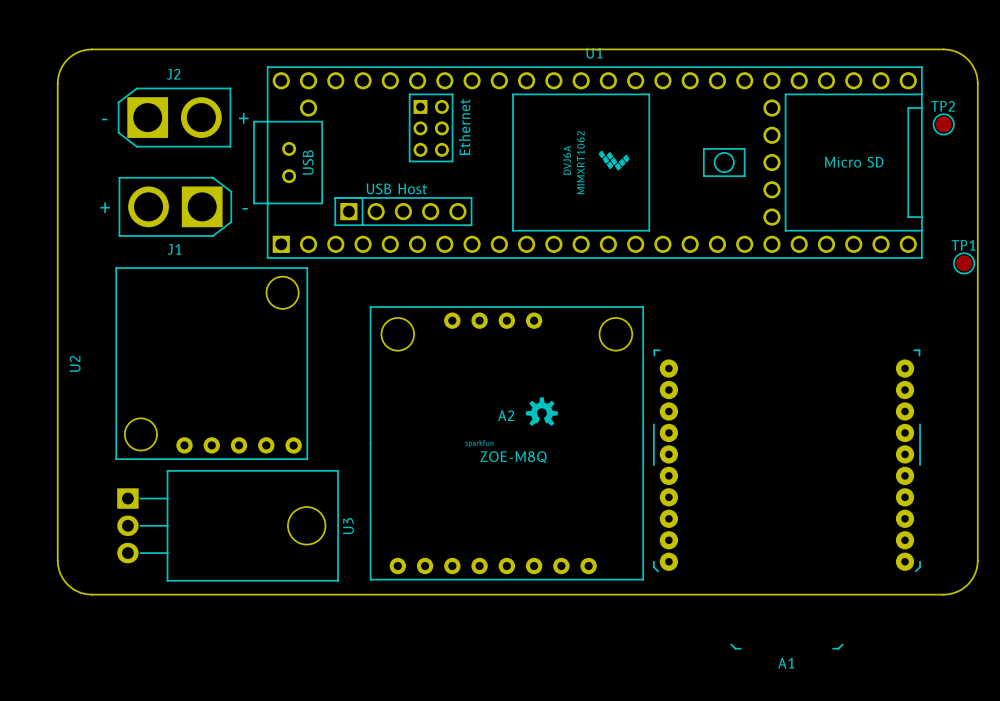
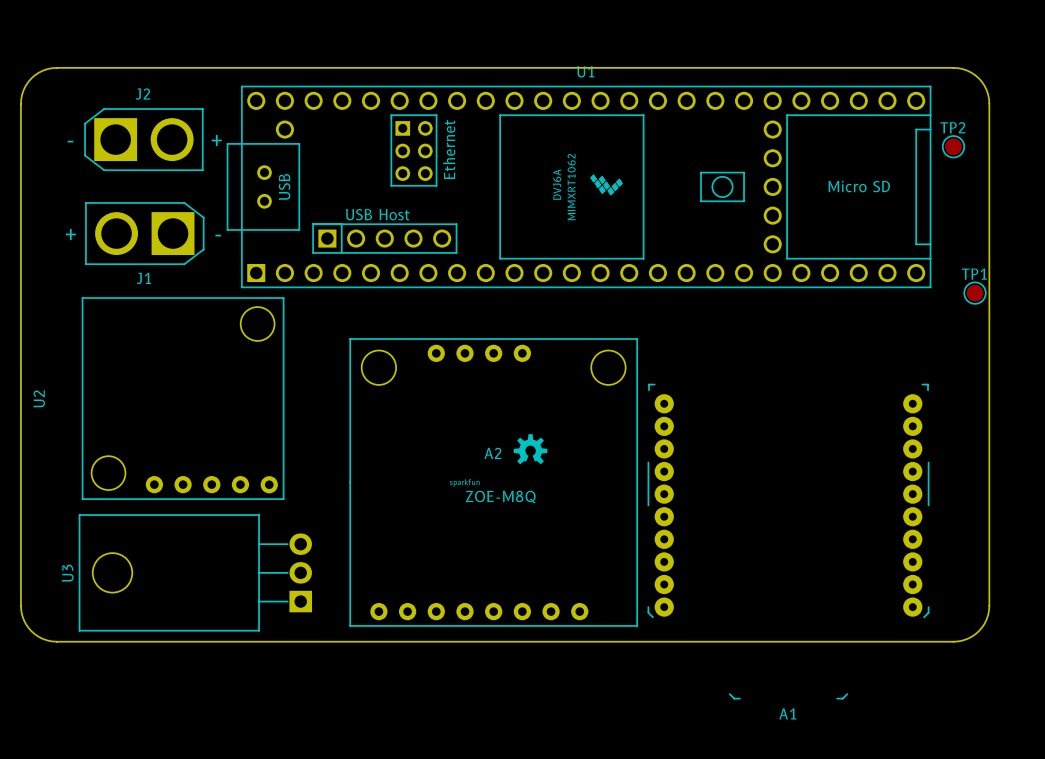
U3 rotation: 0° (227, 525) -> 180° (195, 572)

